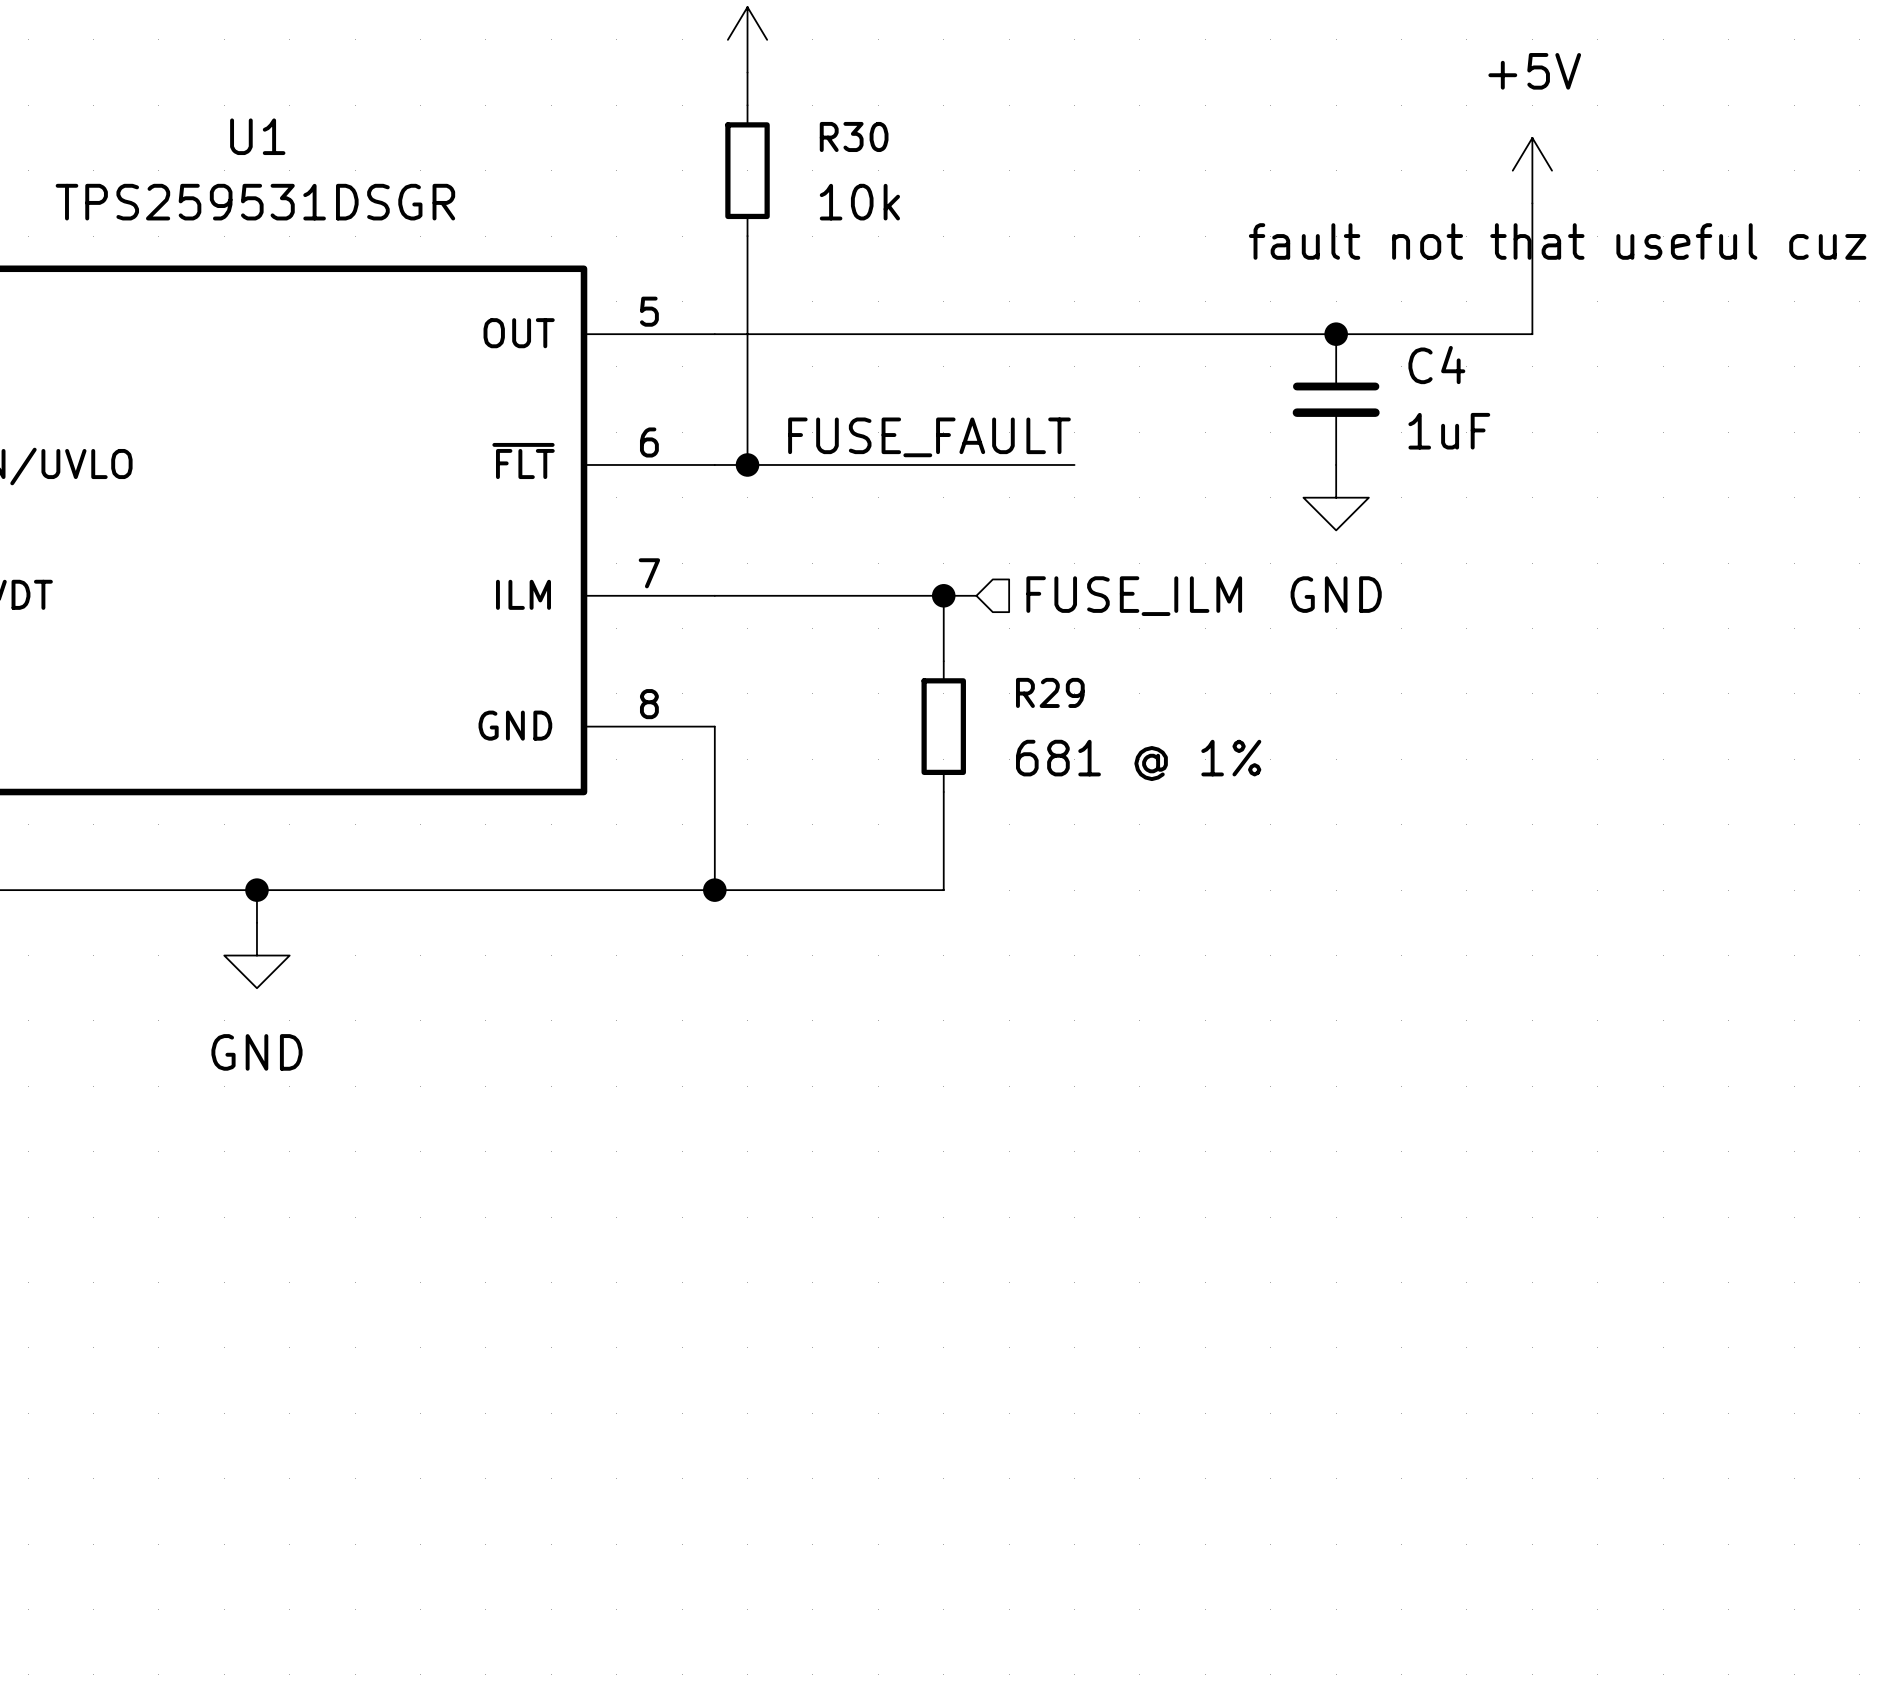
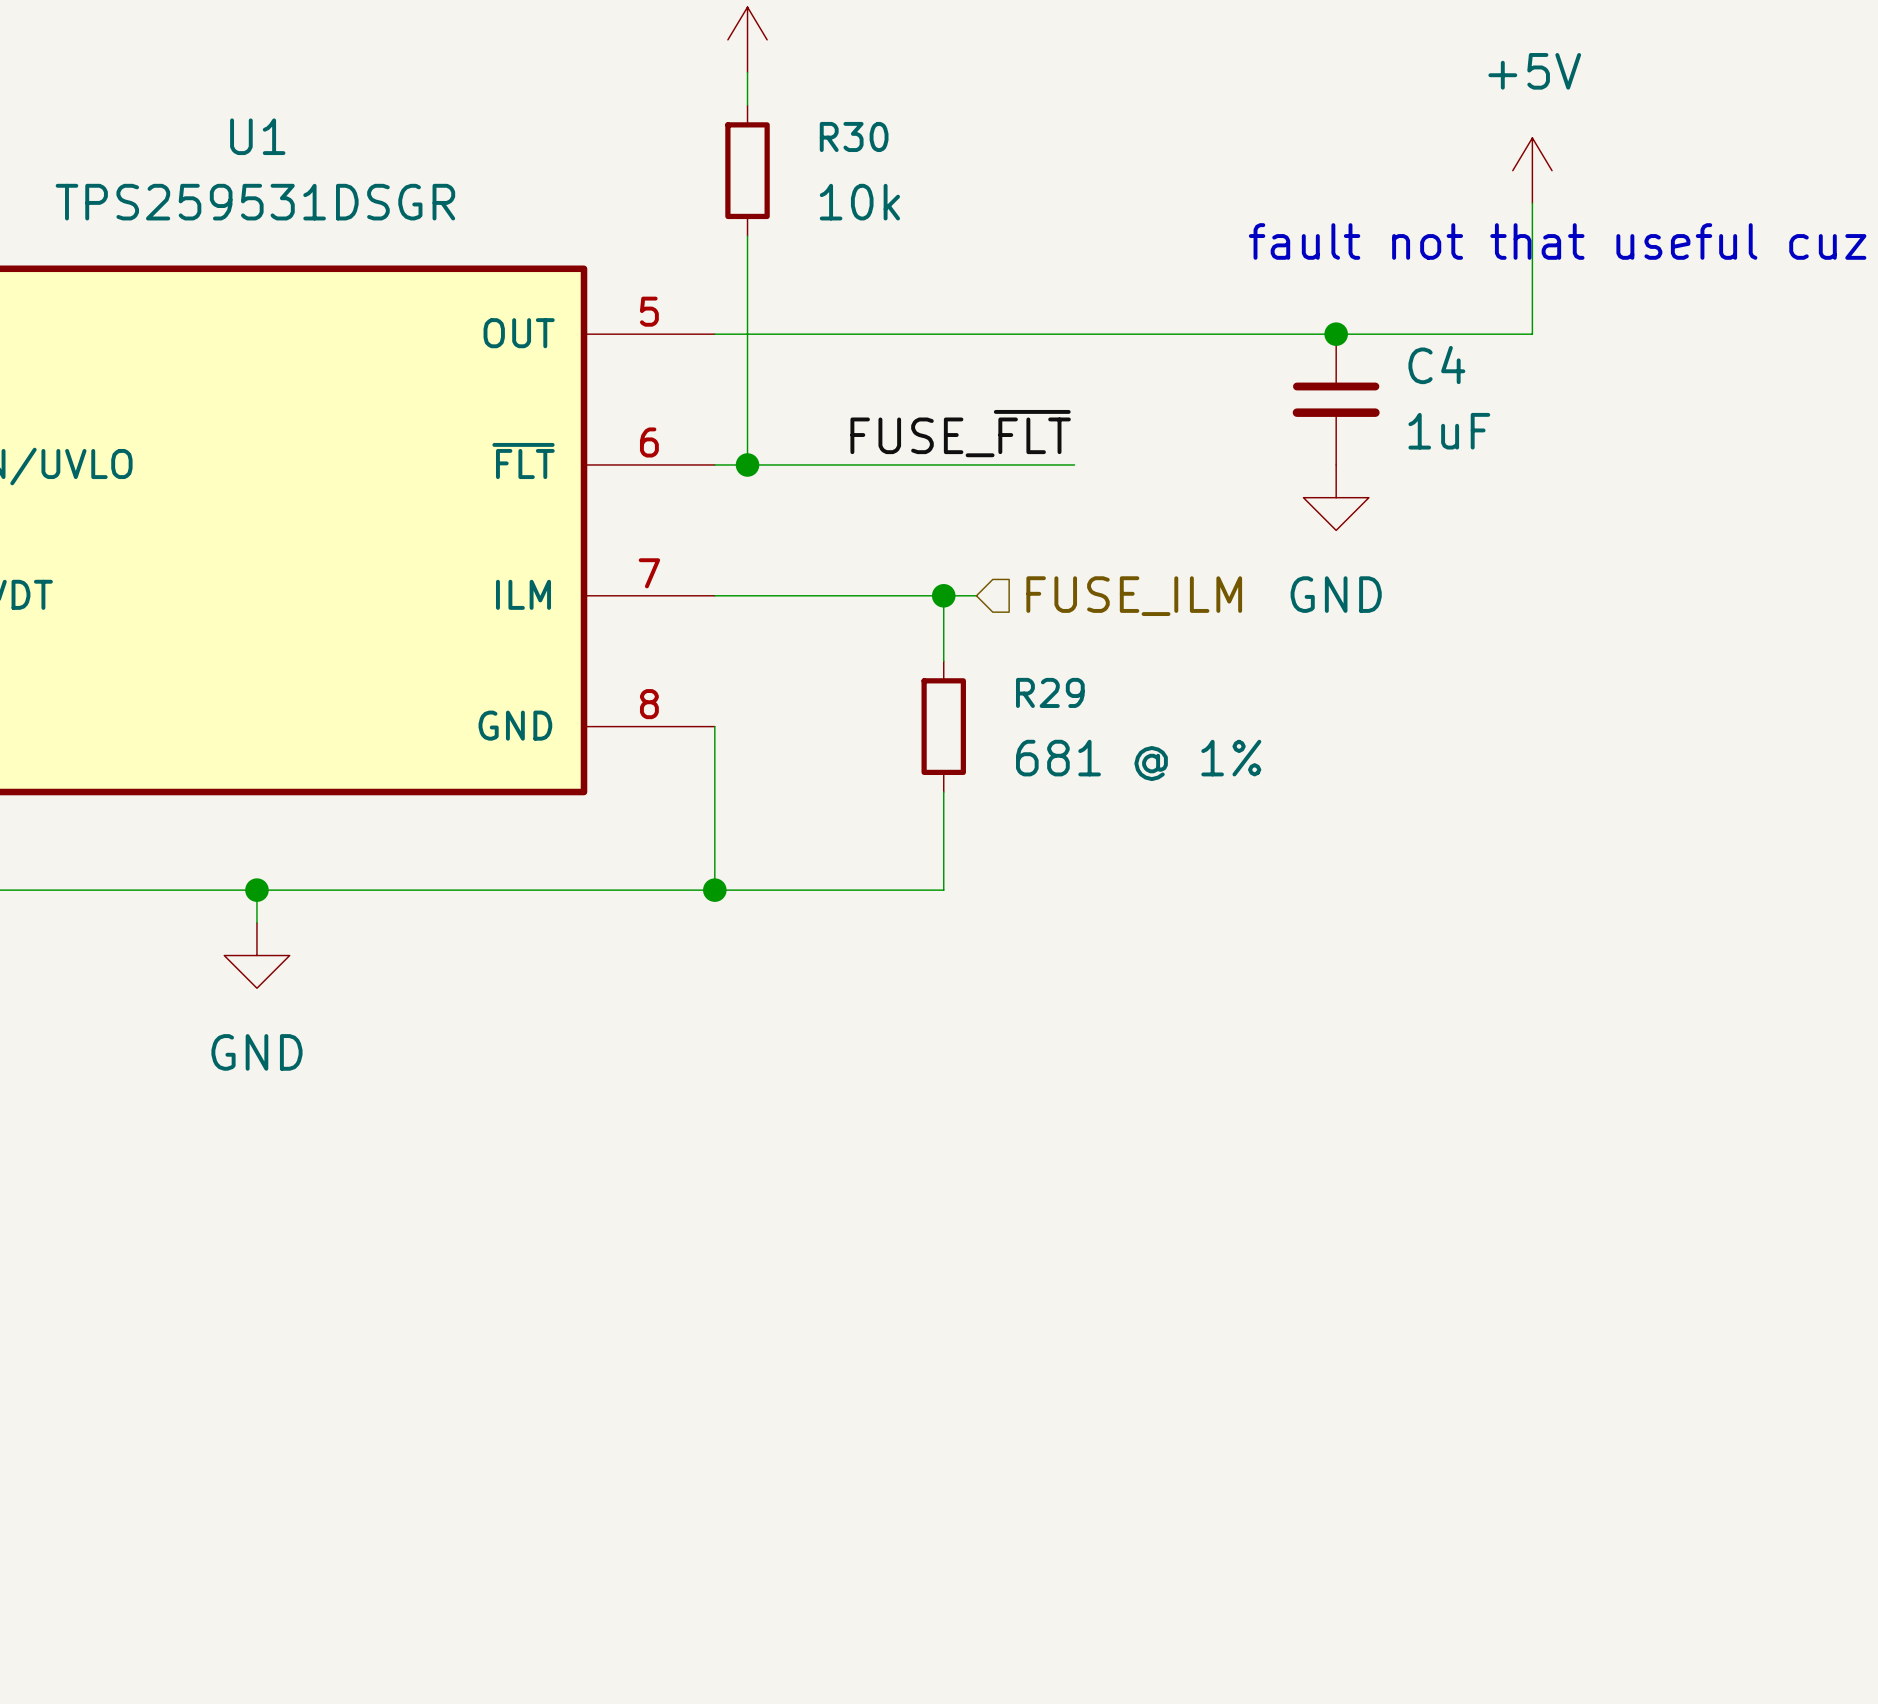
label: FUSE_FAULT (929, 437) -> FUSE_~{FLT} (960, 433)

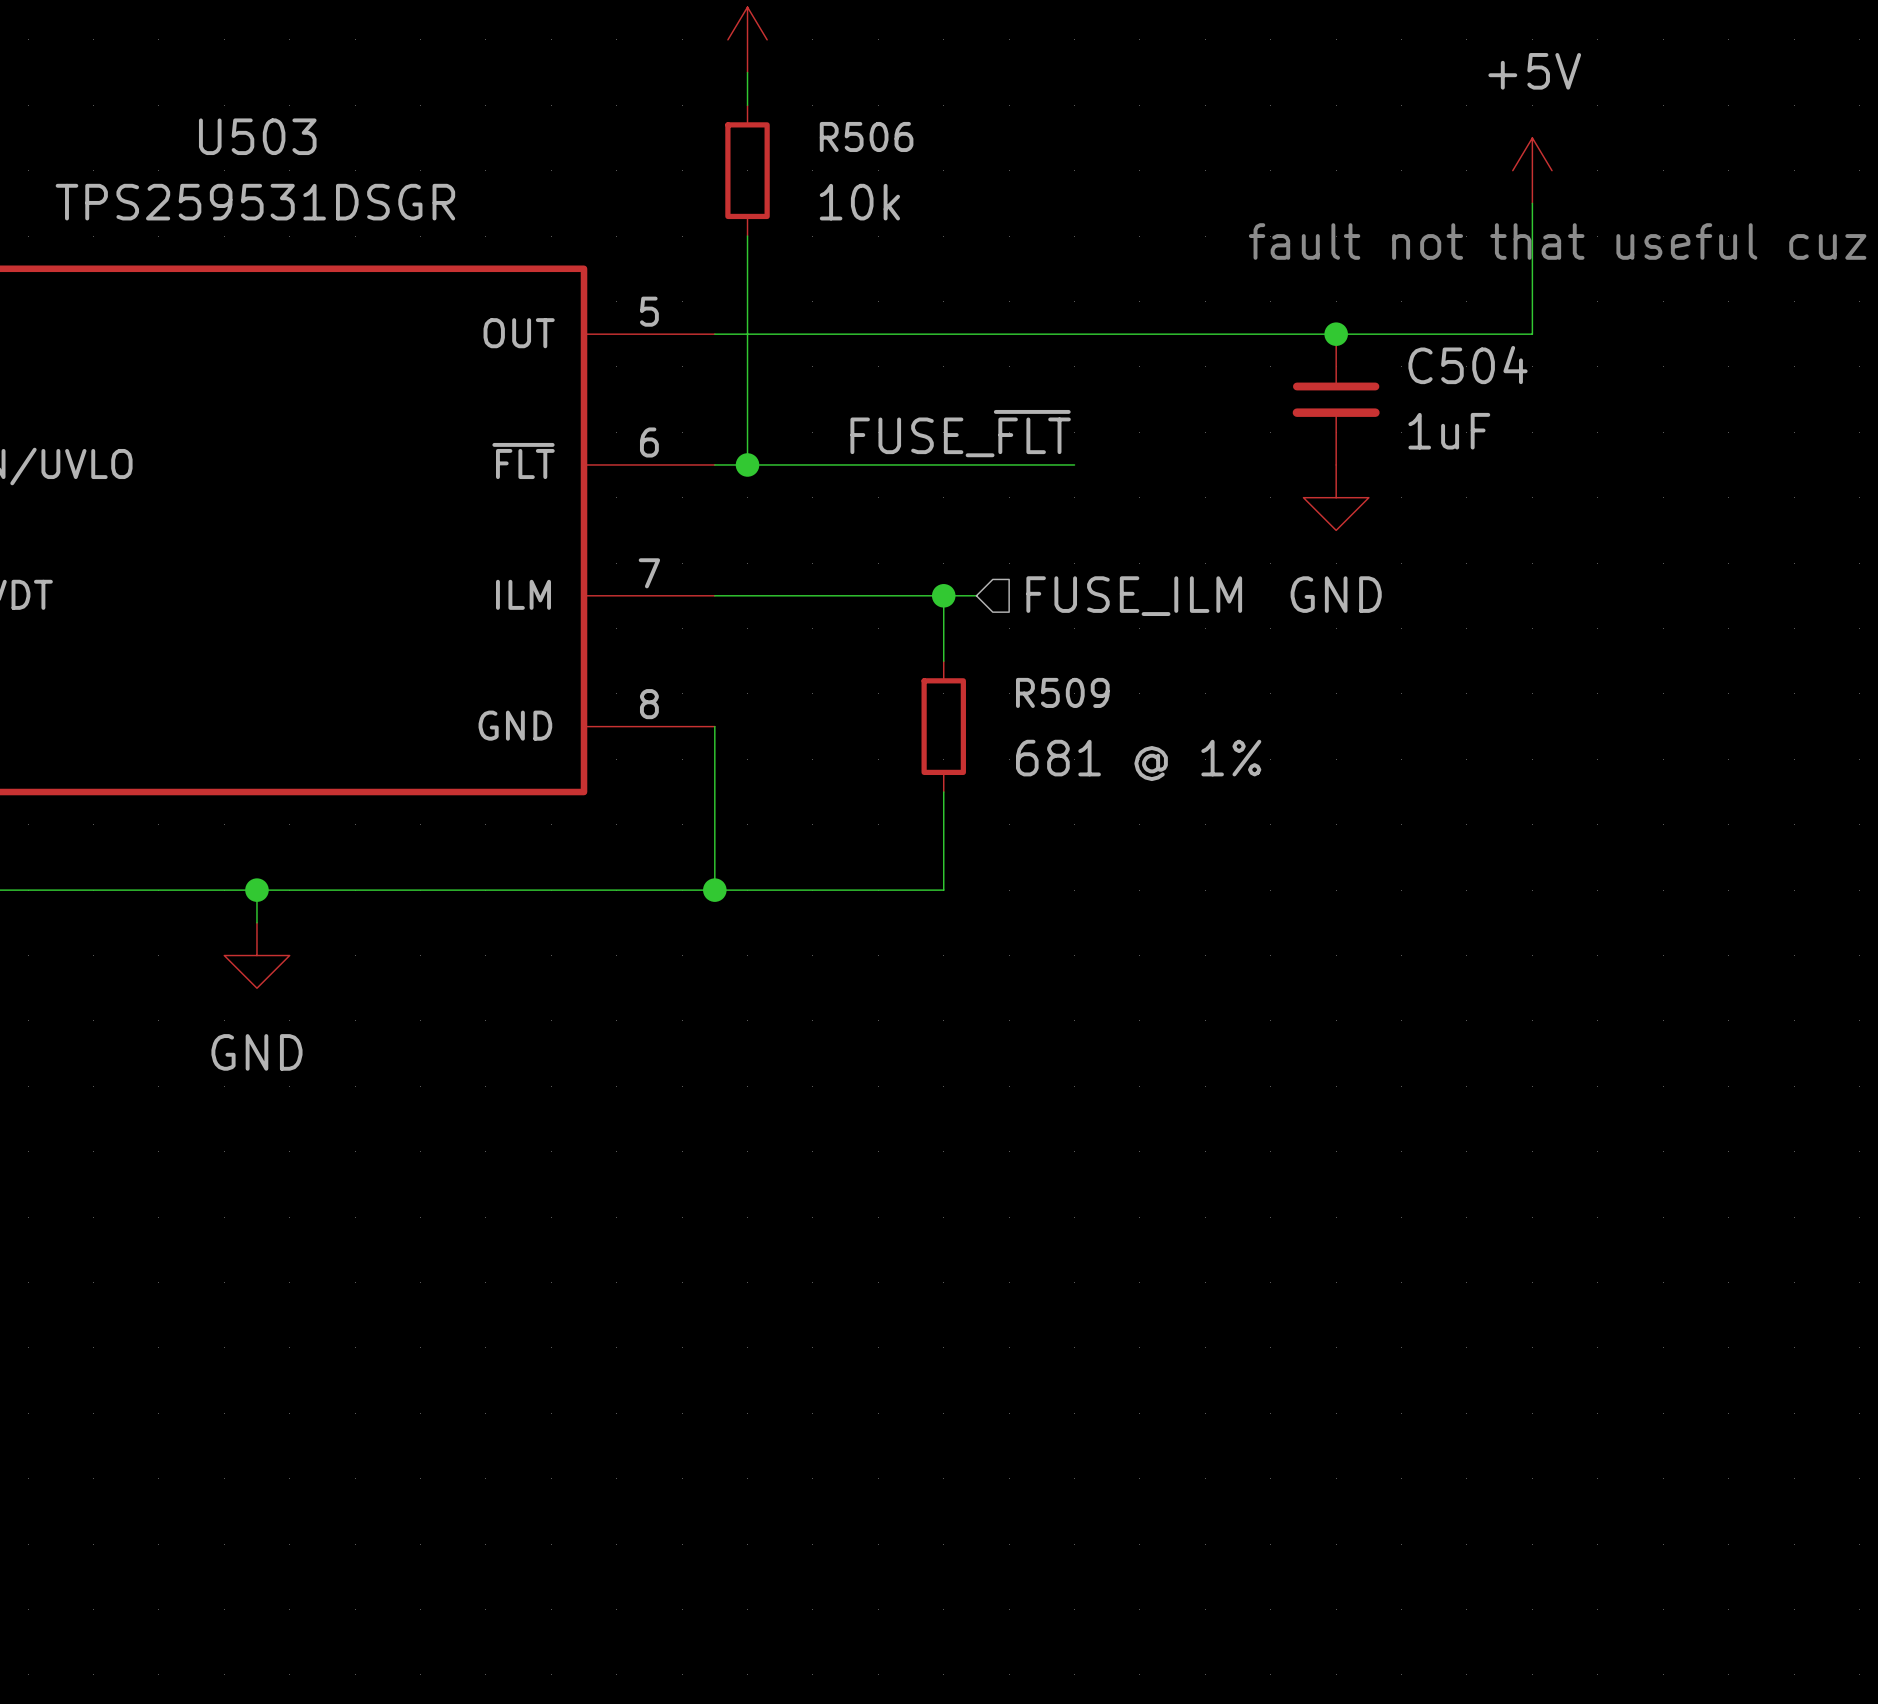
U1 name: U1 (257, 136) -> U503 (257, 136)
R30 name: R30 (854, 136) -> R506 (866, 136)
C4 name: C4 (1436, 365) -> C504 (1468, 365)
R29 name: R29 (1050, 692) -> R509 (1062, 692)

